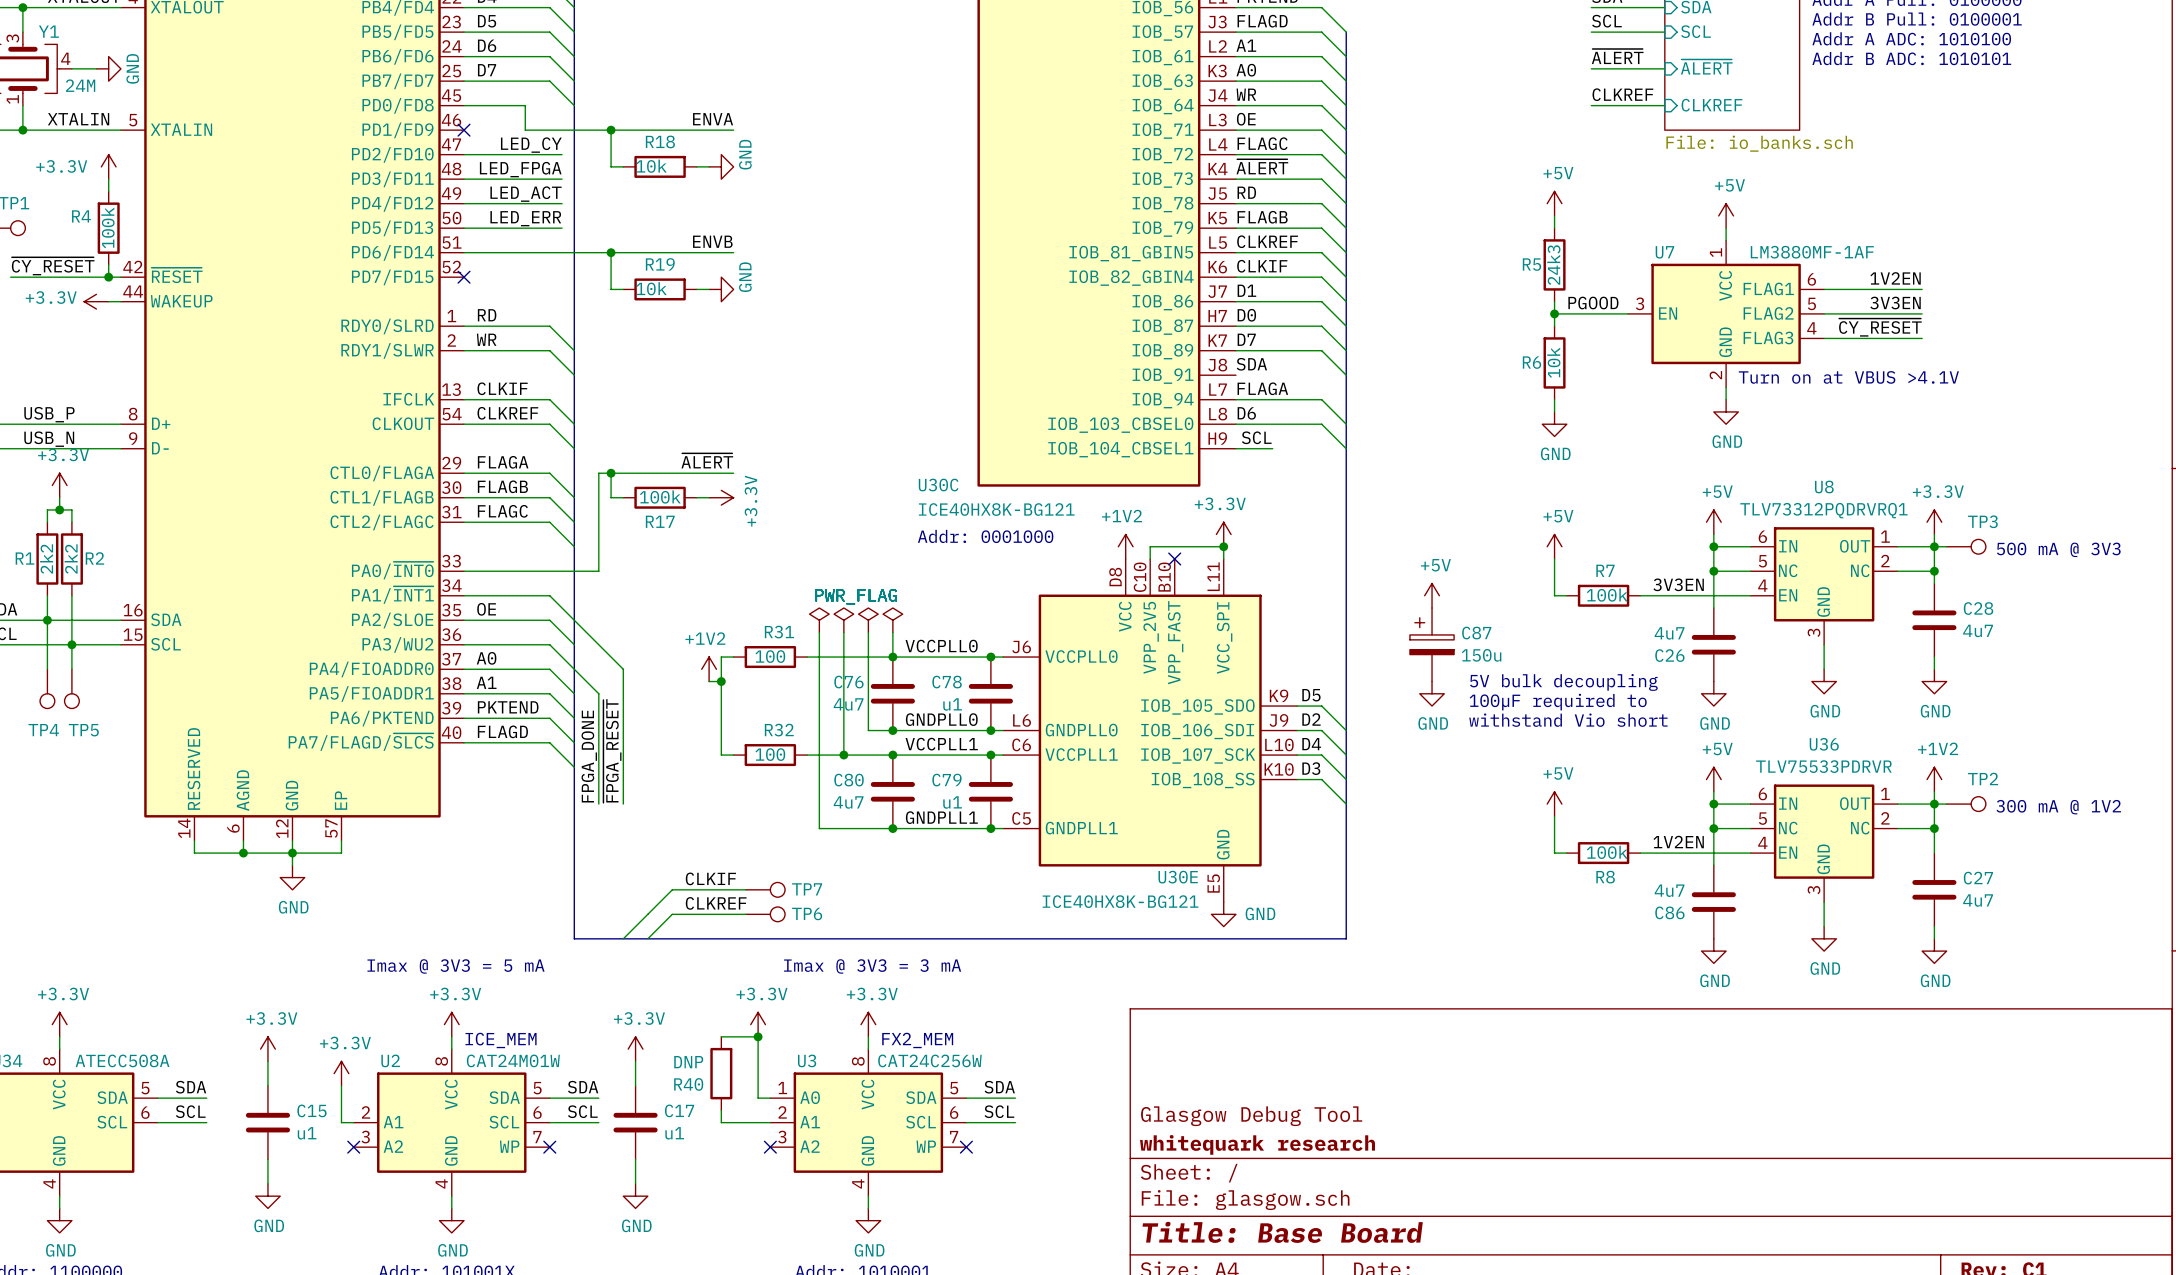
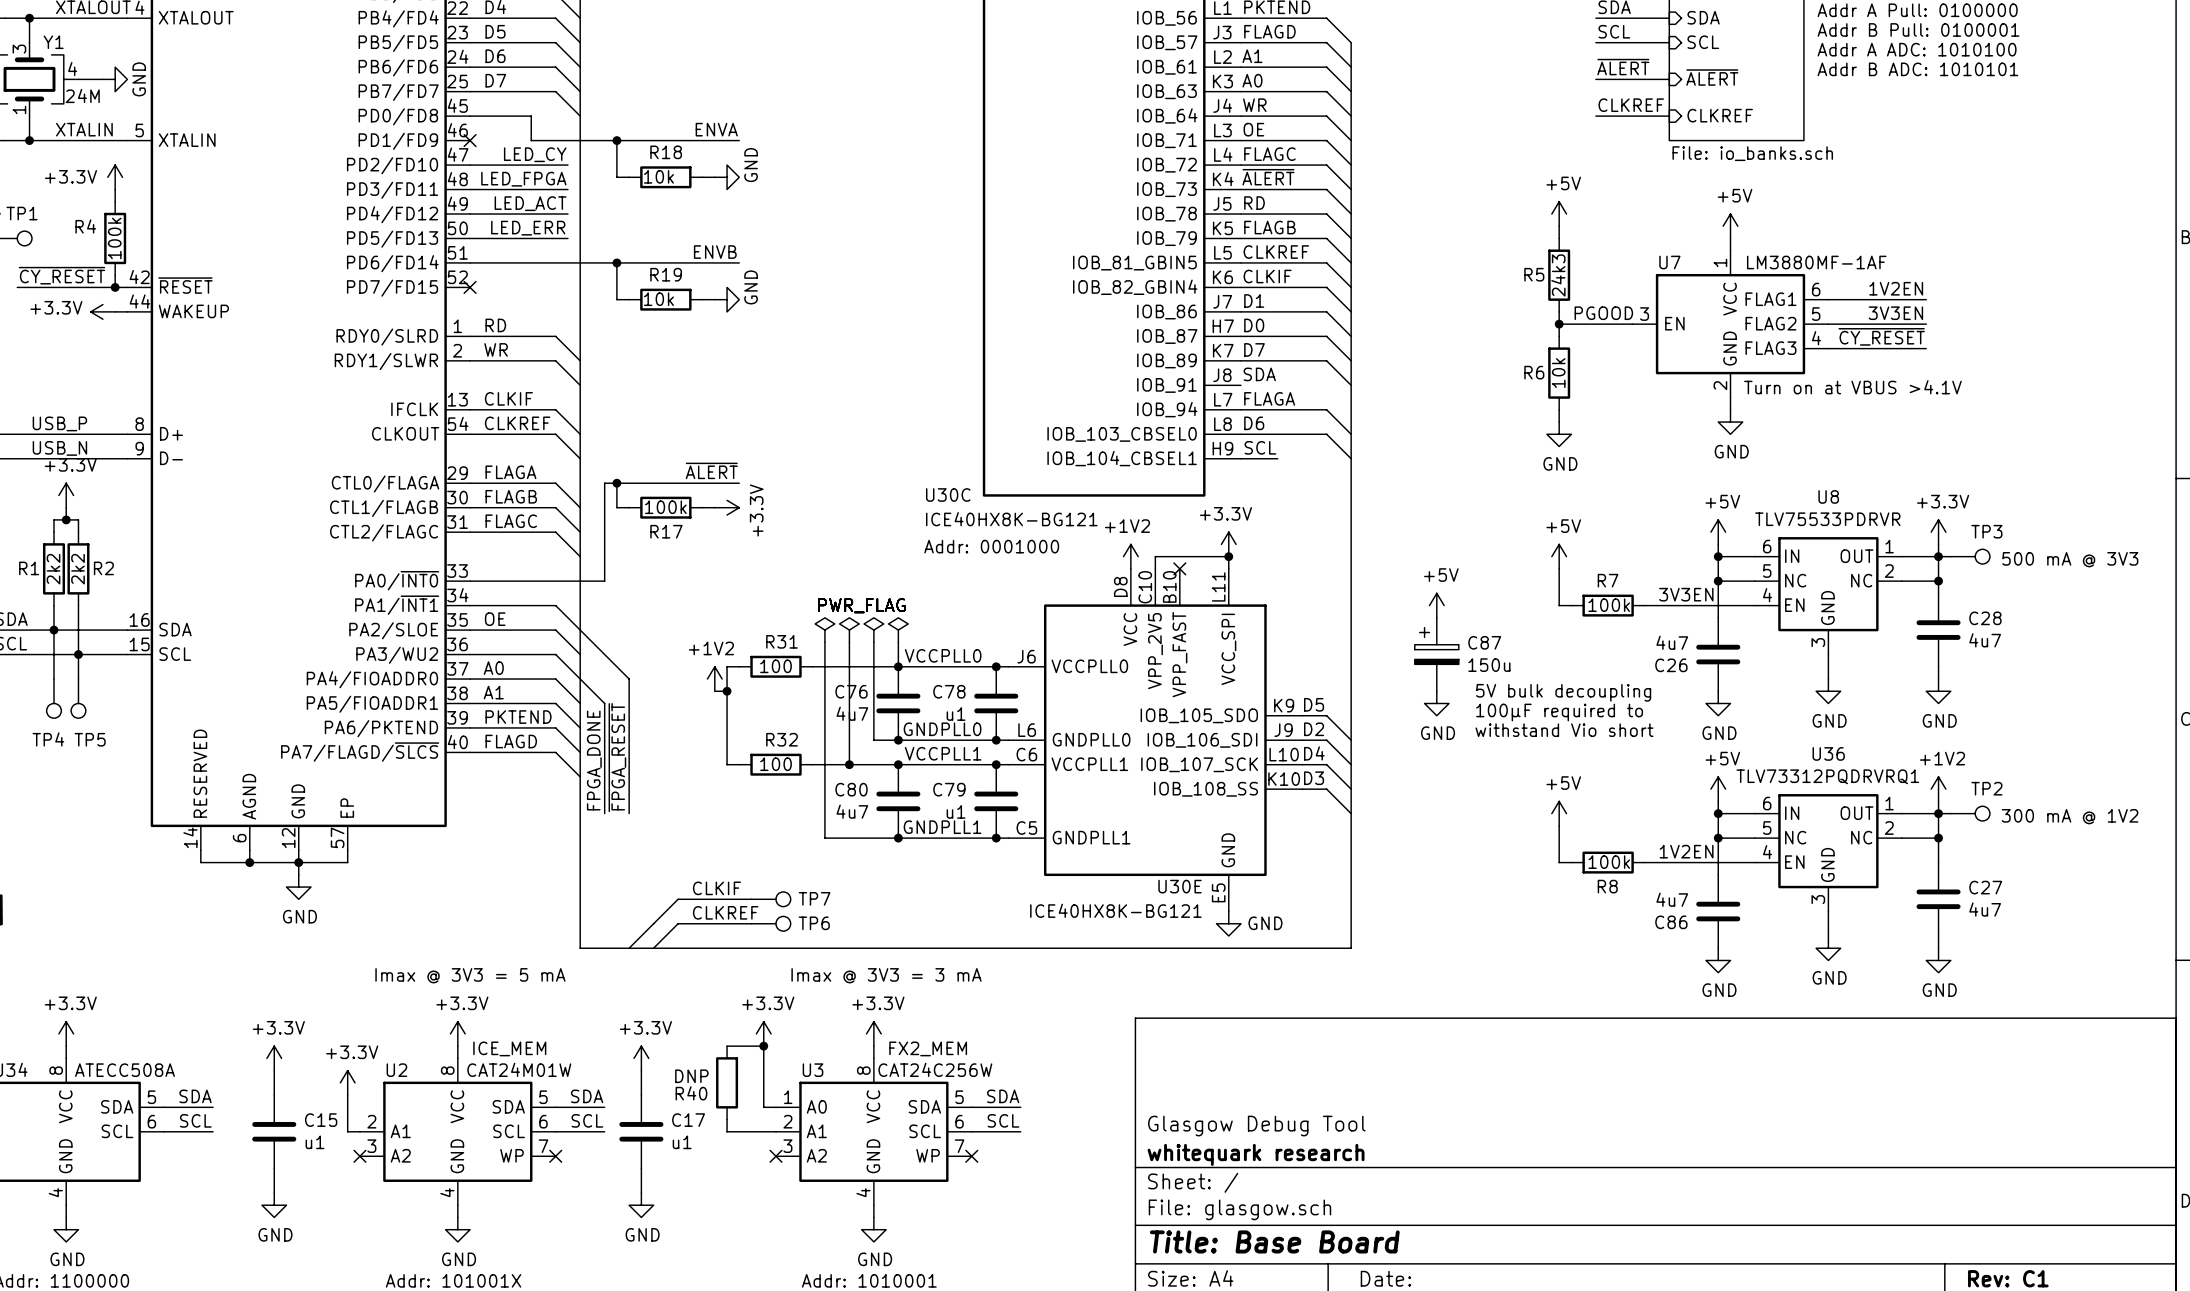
U8 value: TLV73312PQDRVRQ1 (1823, 510) -> TLV75533PDRVR (1827, 519)
U36 value: TLV75533PDRVR (1823, 766) -> TLV73312PQDRVRQ1 (1827, 776)
R40 value: DNP (688, 1062) -> none
R40 text: none -> DNP (691, 1076)

